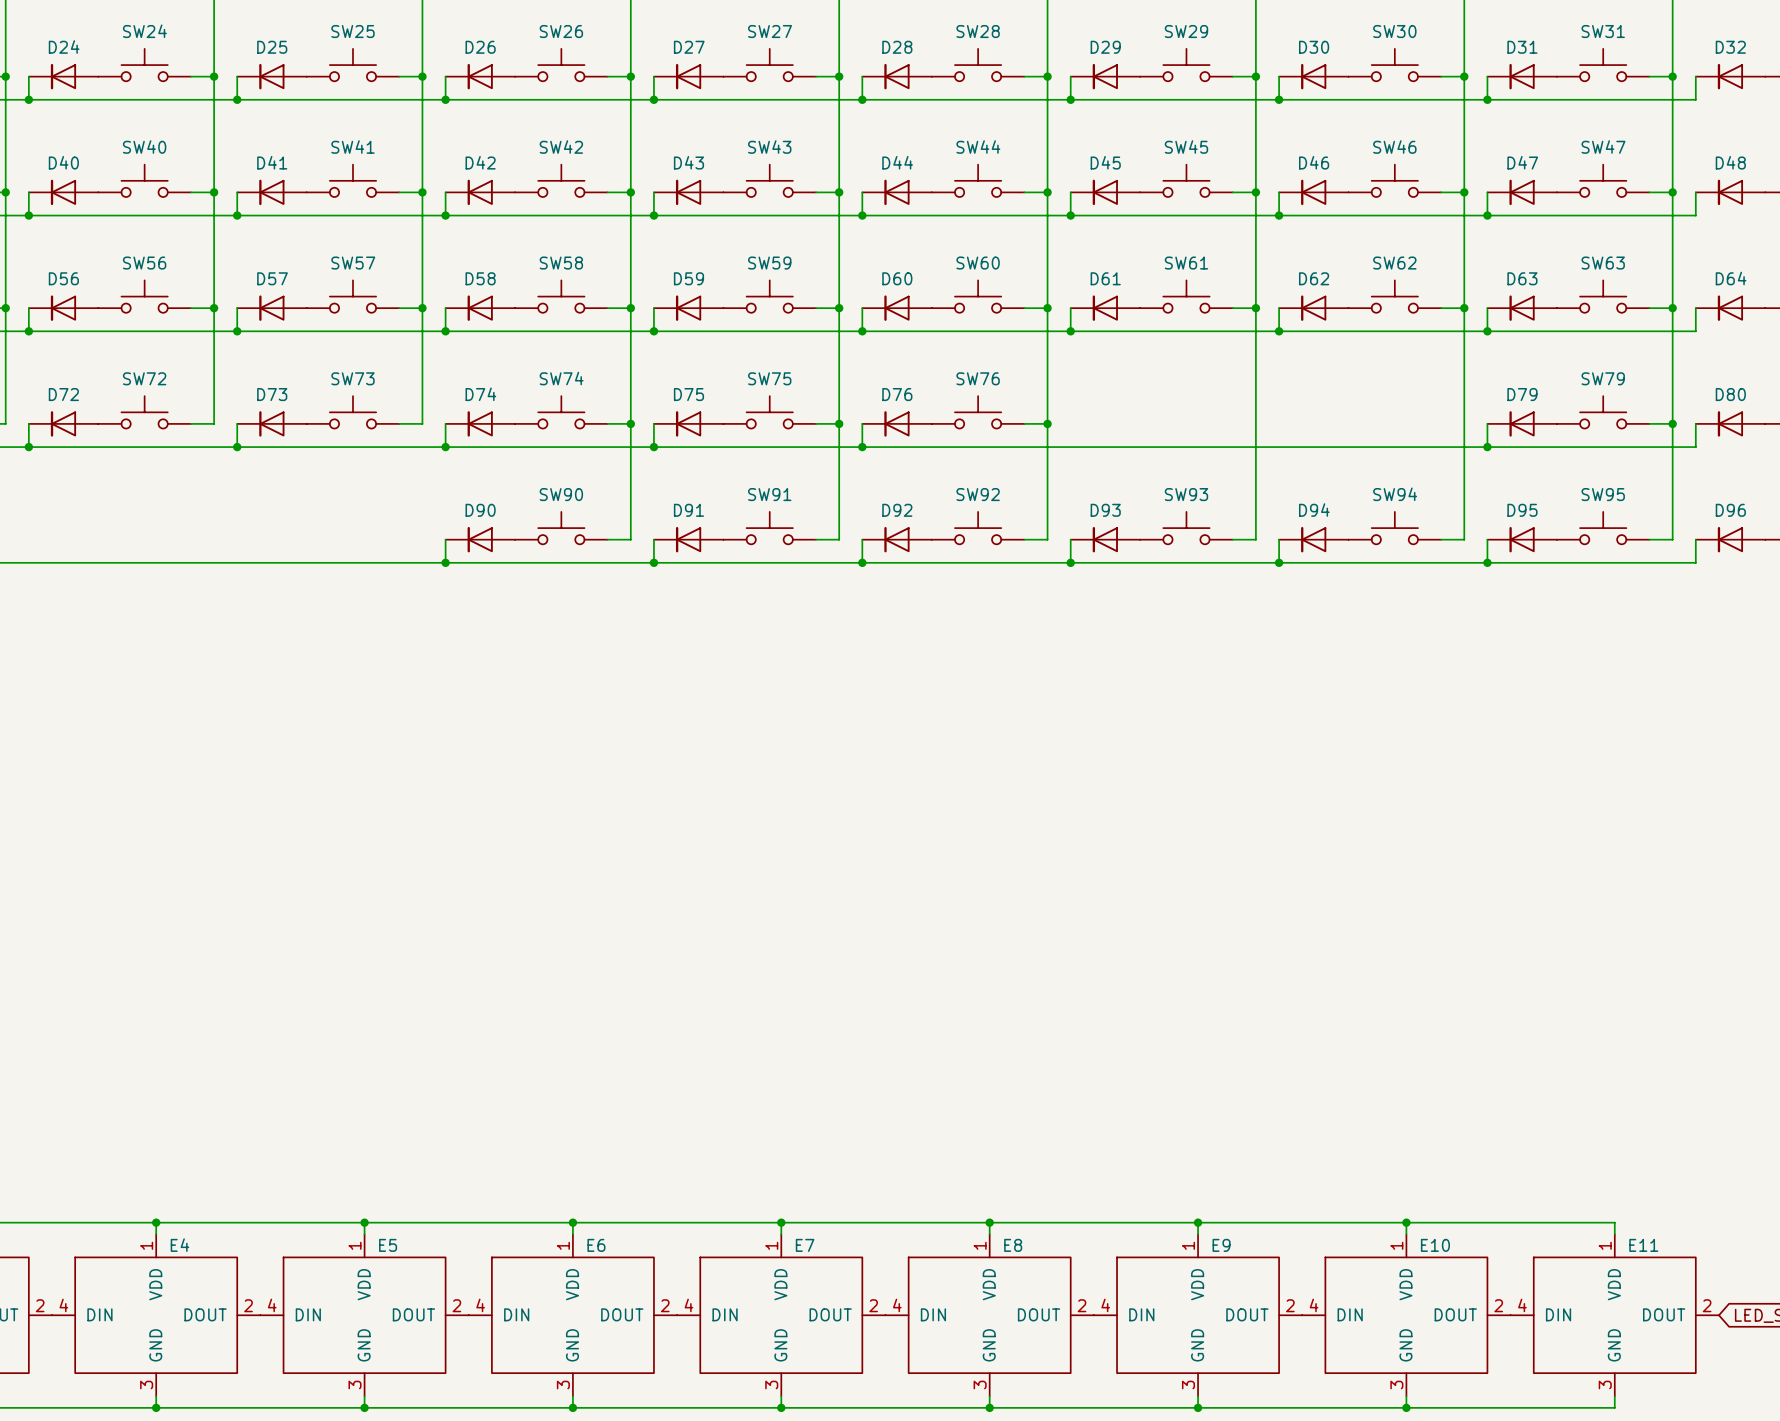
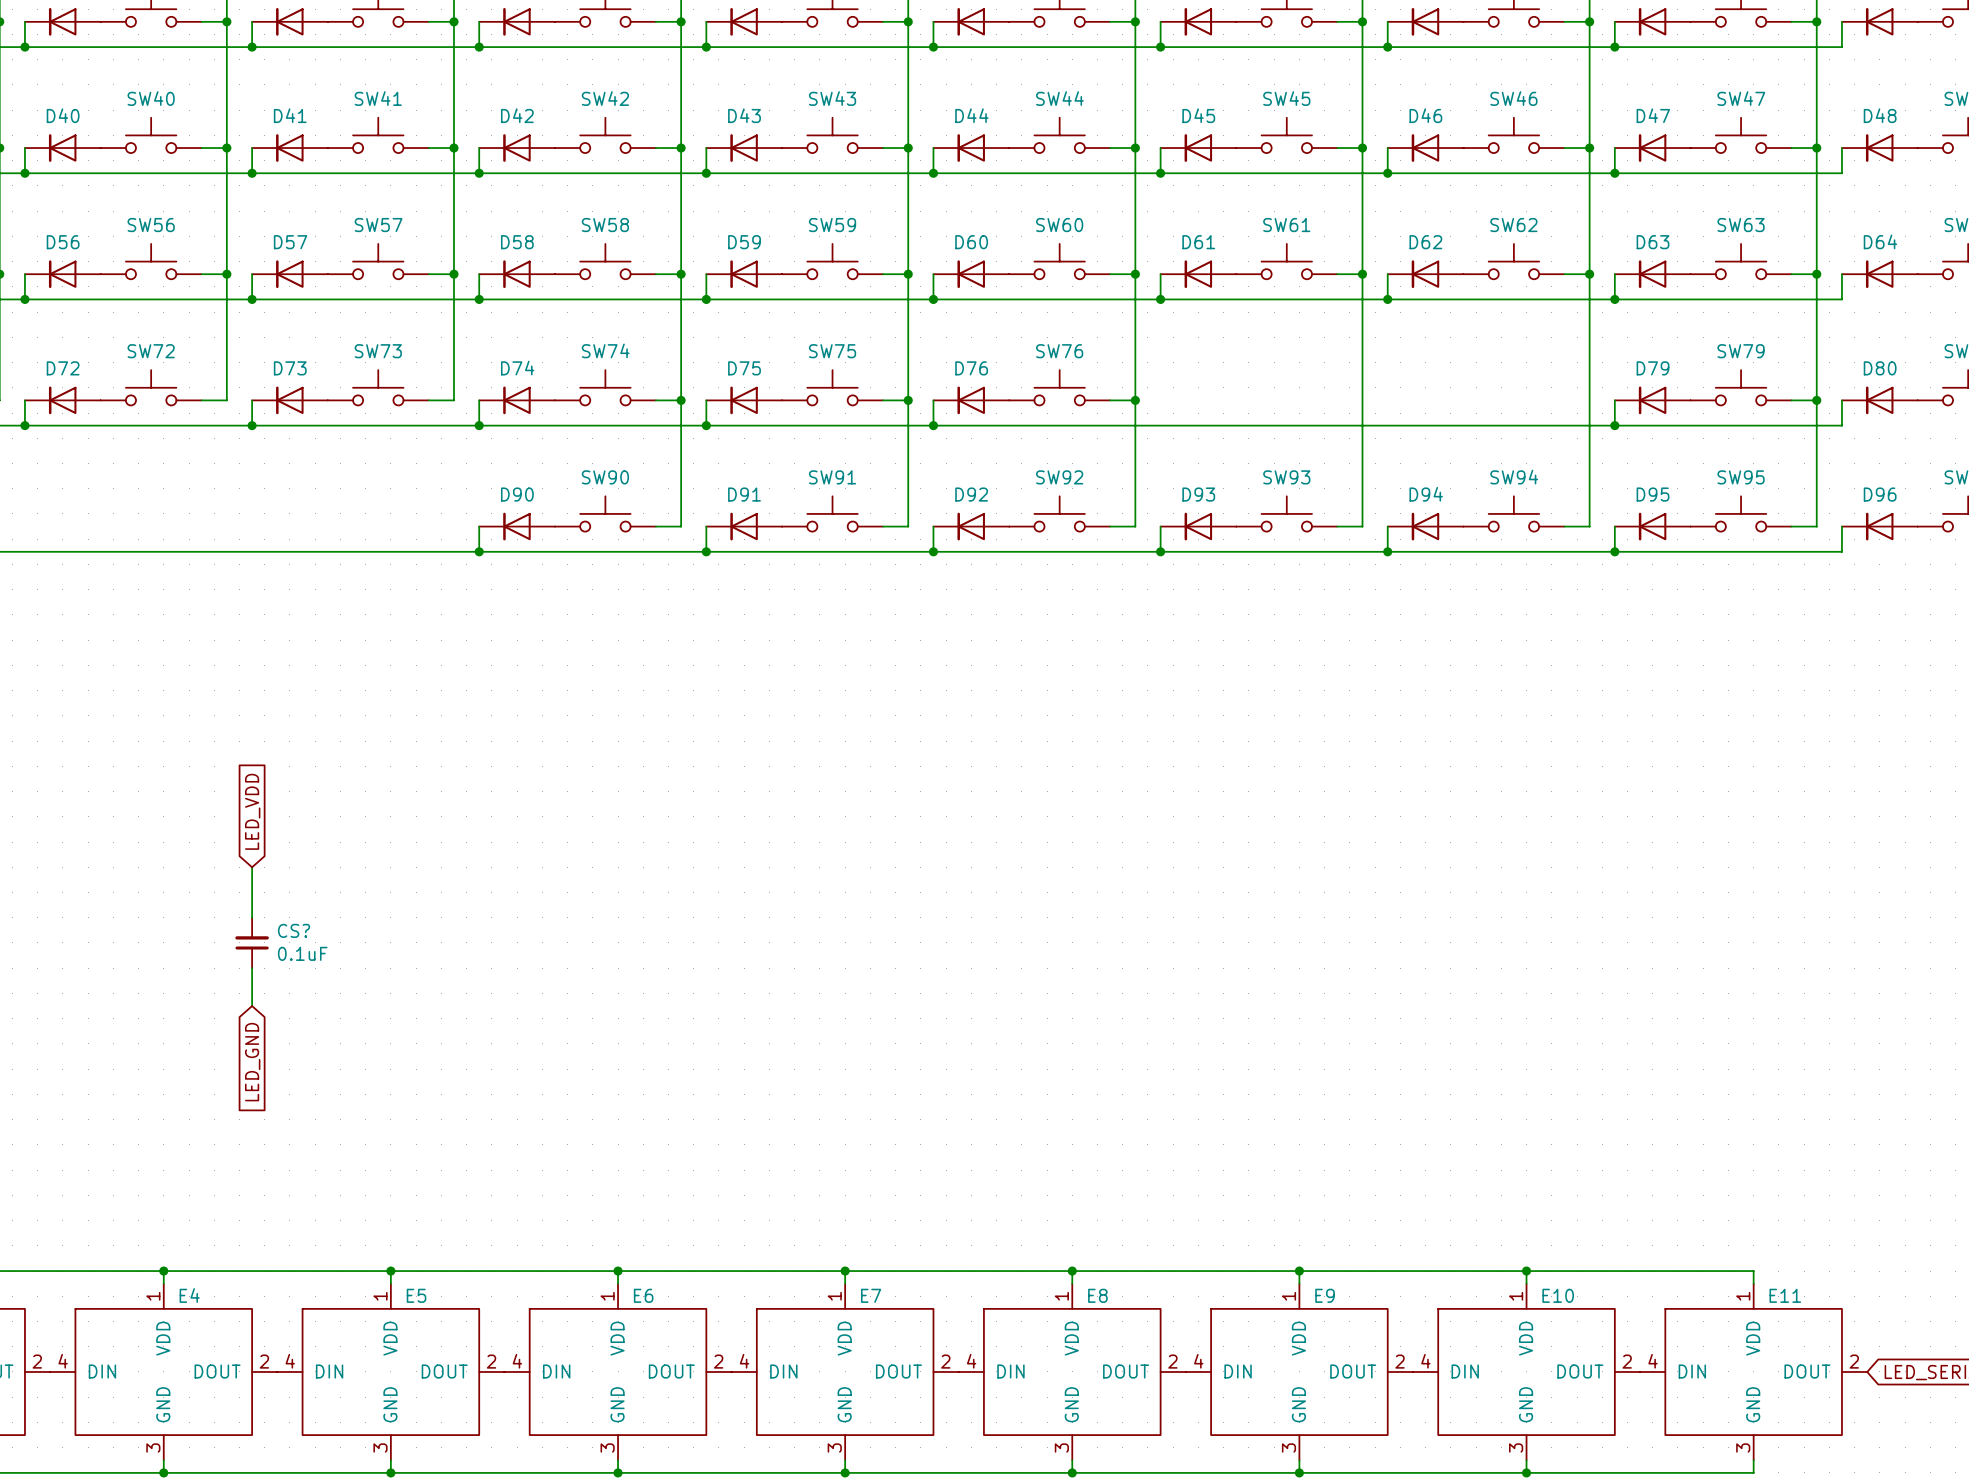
global label: none -> LED_VDD (252, 811)
wire: none -> (252, 867) (252, 917)
CS?: none -> 0.1uF (252, 942)
wire: none -> (252, 968) (252, 1006)
global label: none -> LED_GND (252, 1062)

